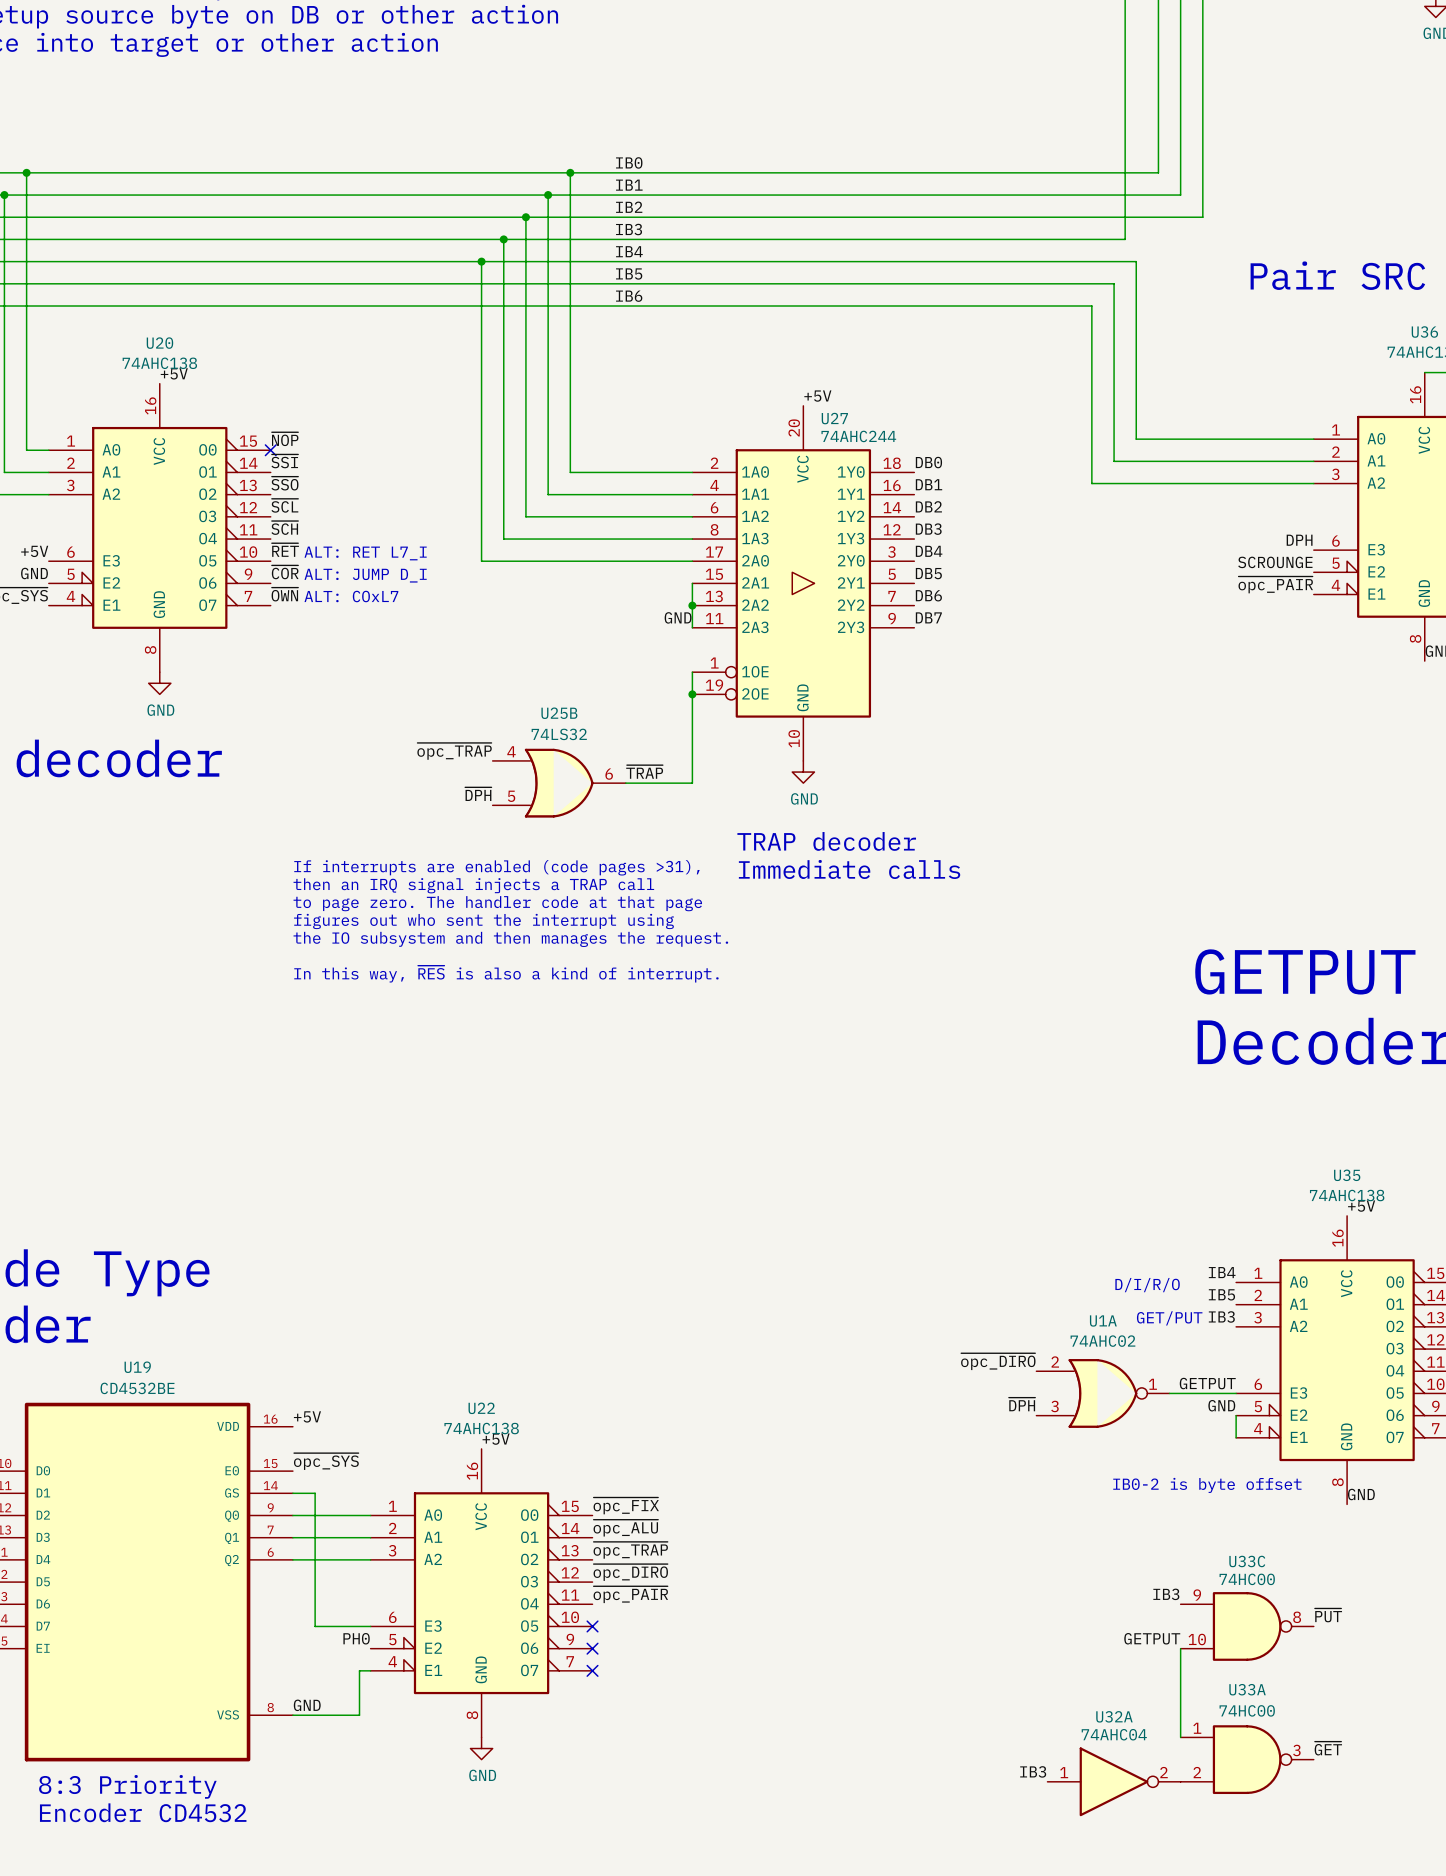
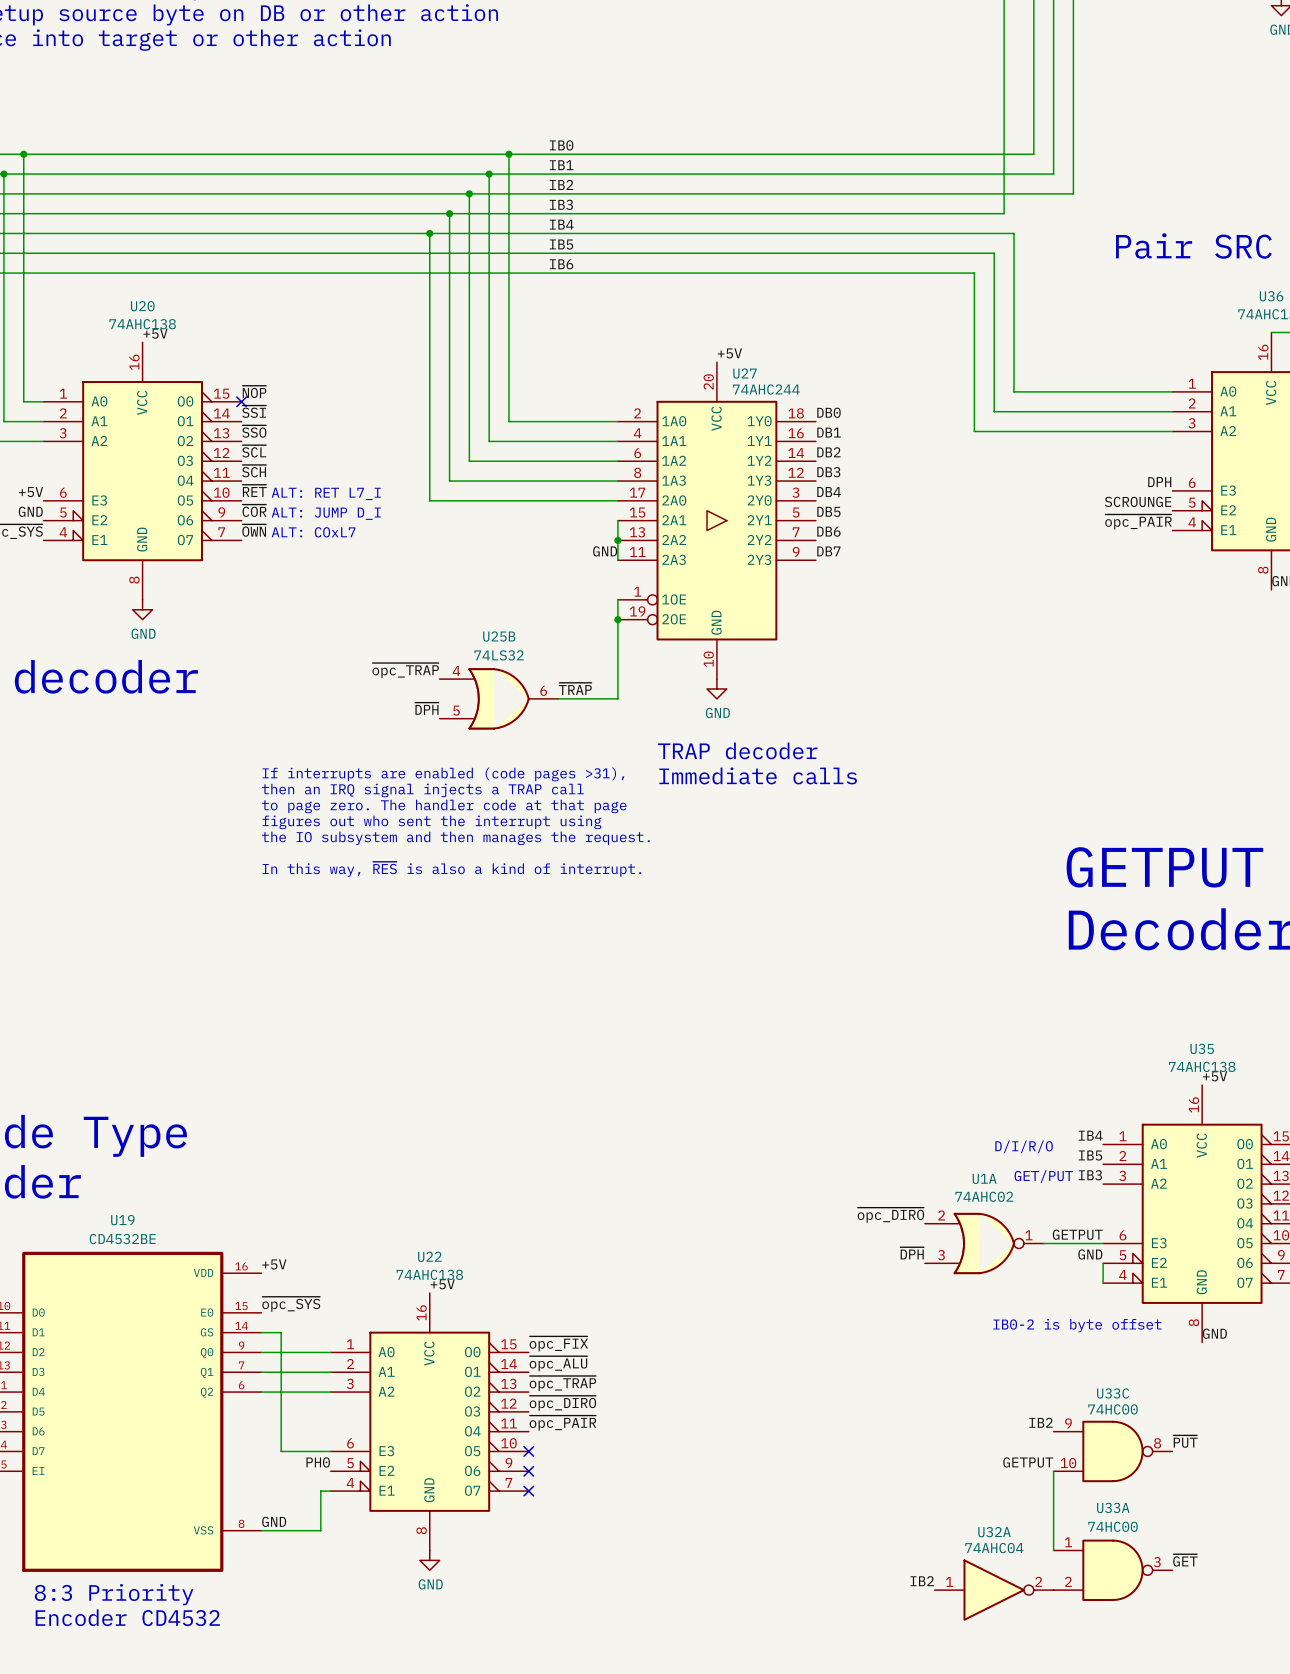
label: IB3 (1166, 1594) -> IB2 (1040, 1422)
label: IB3 (1033, 1771) -> IB2 (922, 1581)

